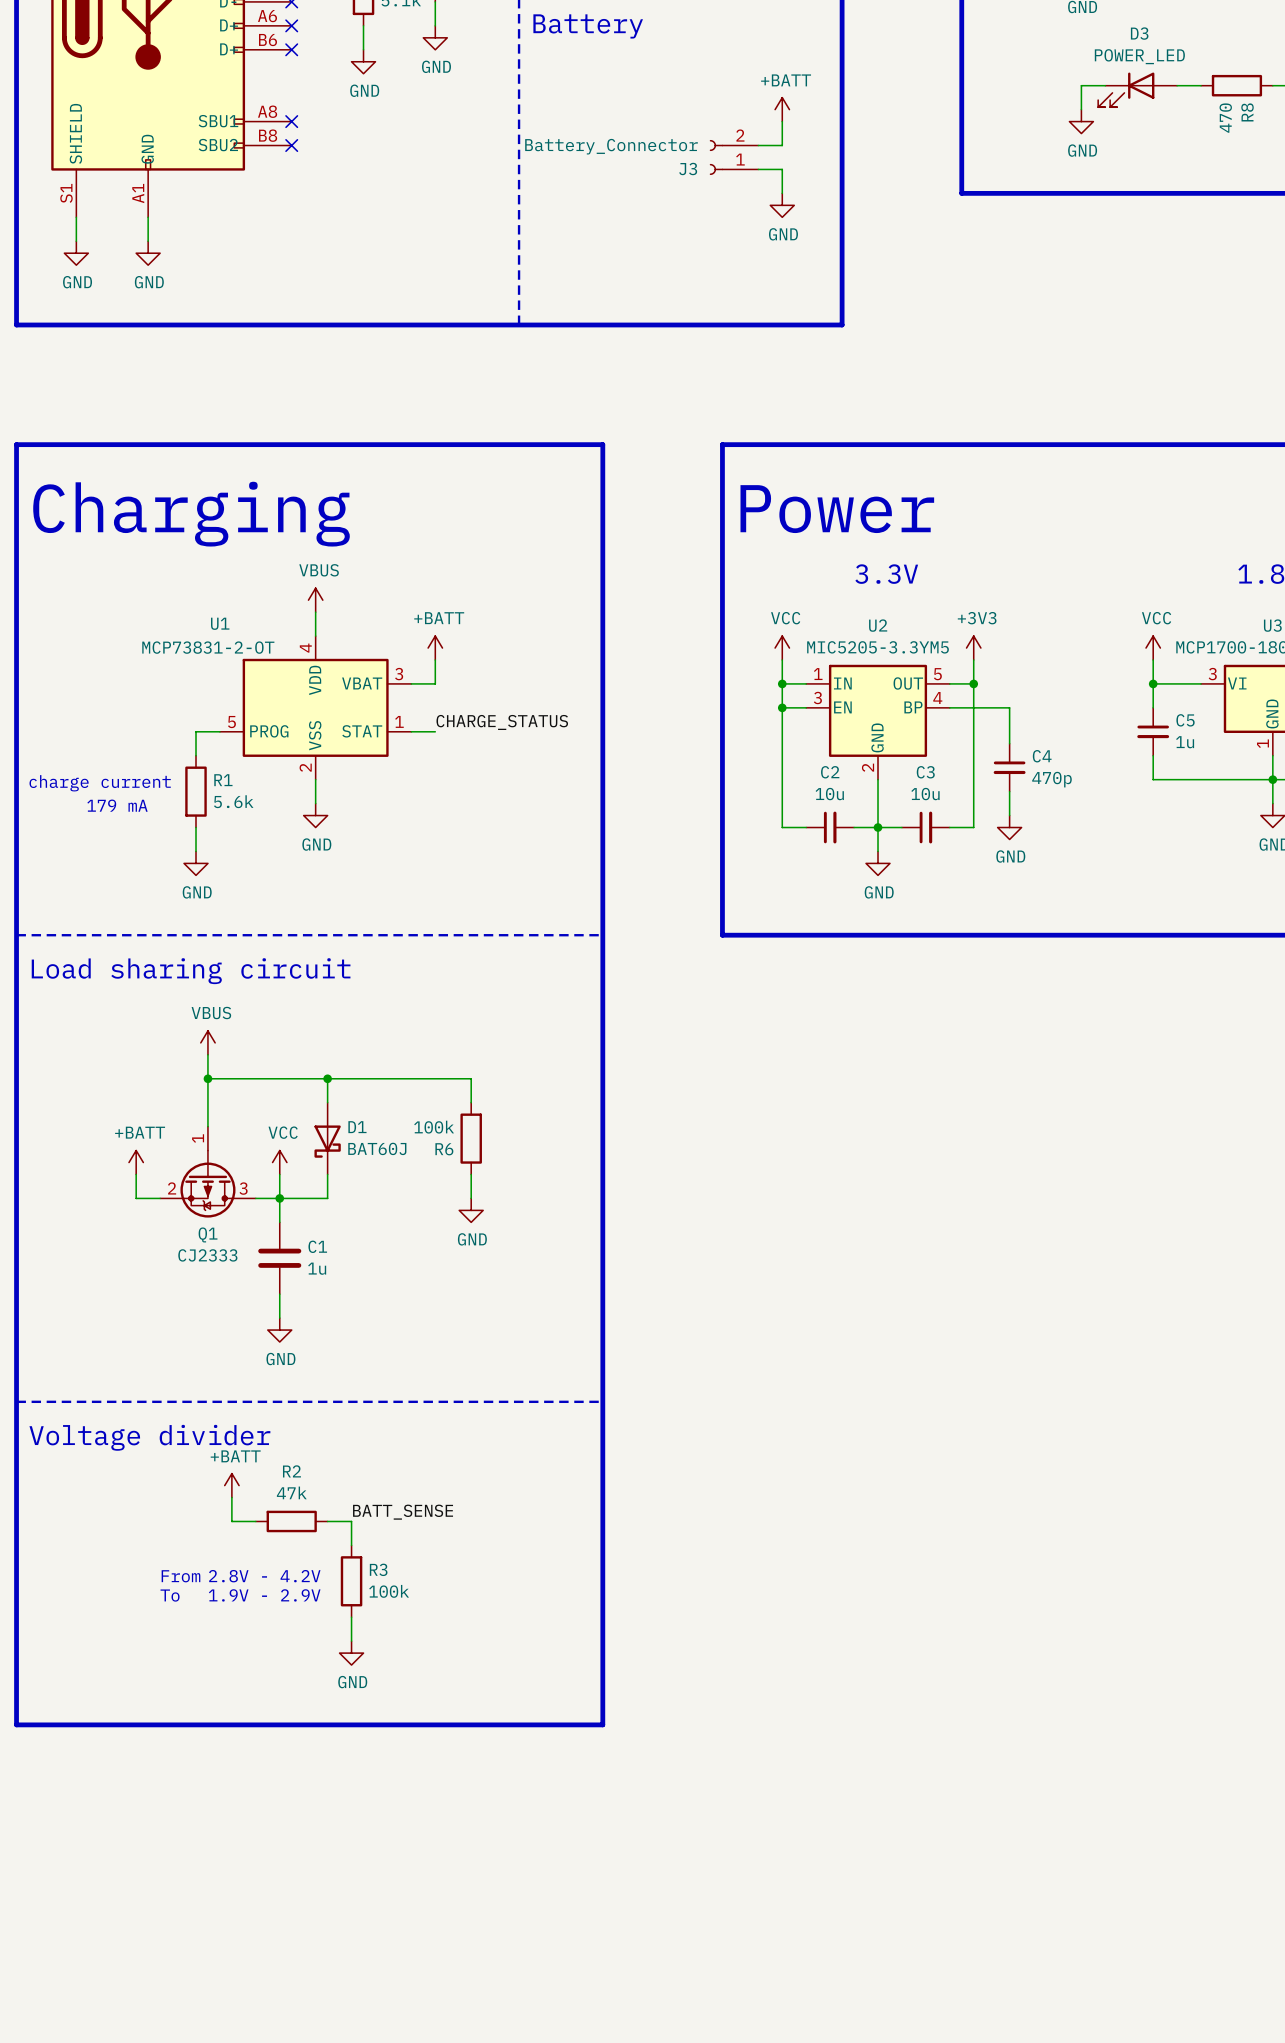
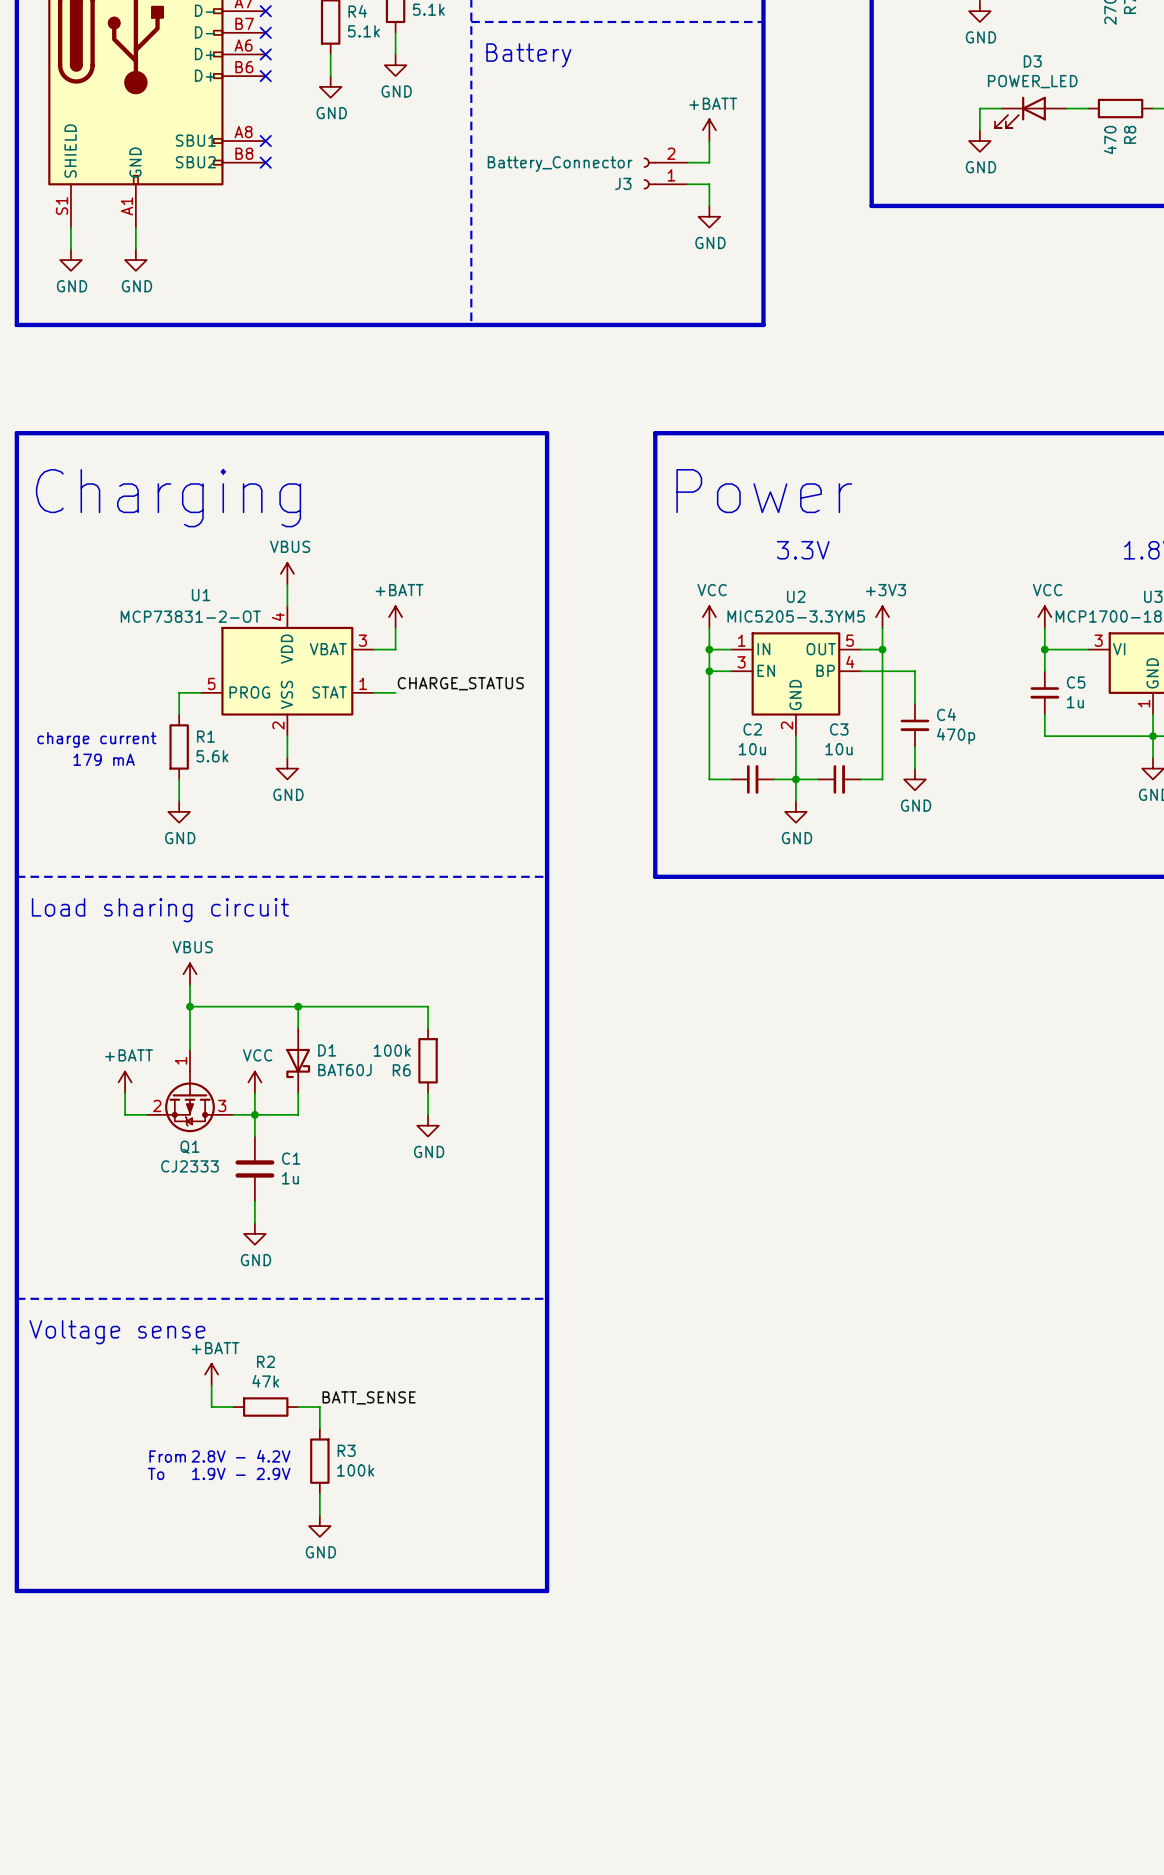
text: Voltage divider (149, 1437) -> Voltage sense (117, 1332)

